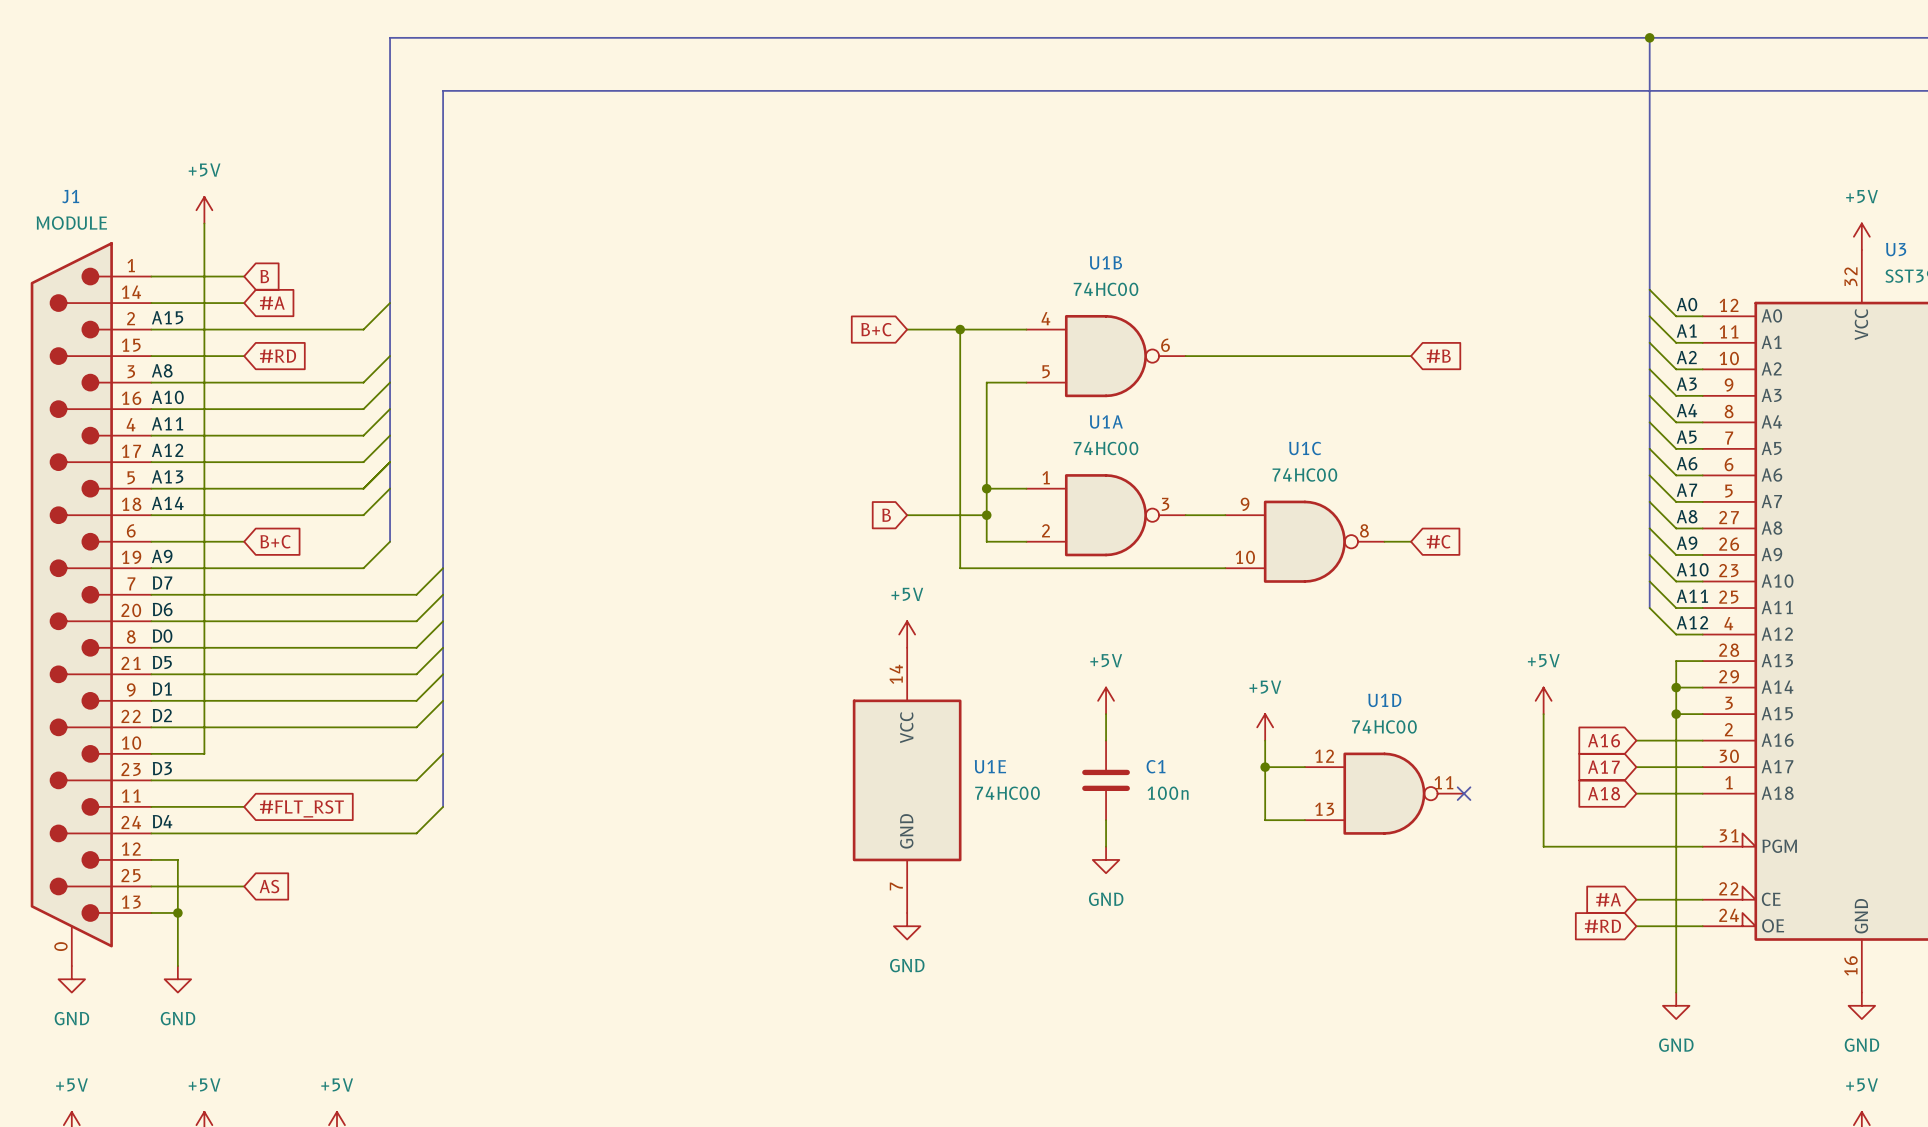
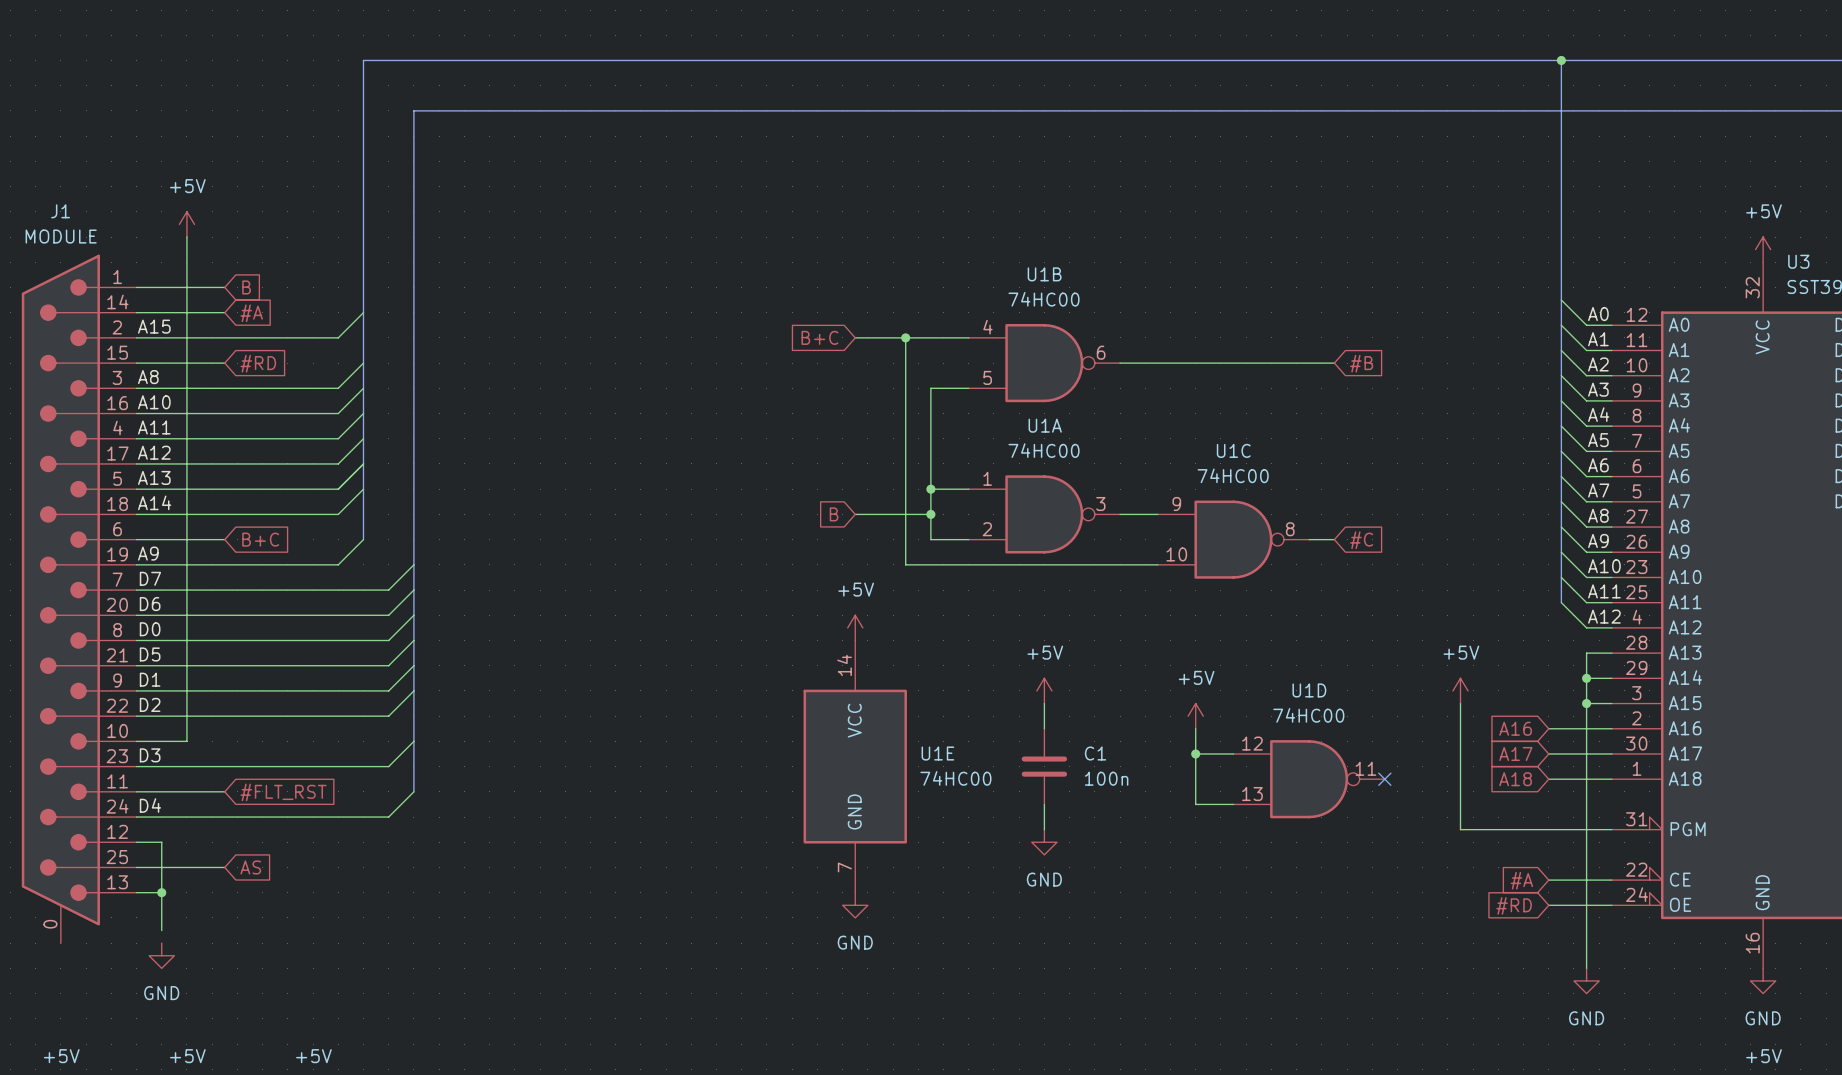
wire: (177, 952) (177, 966) -> none
power symbol: GND (71, 979) -> none

